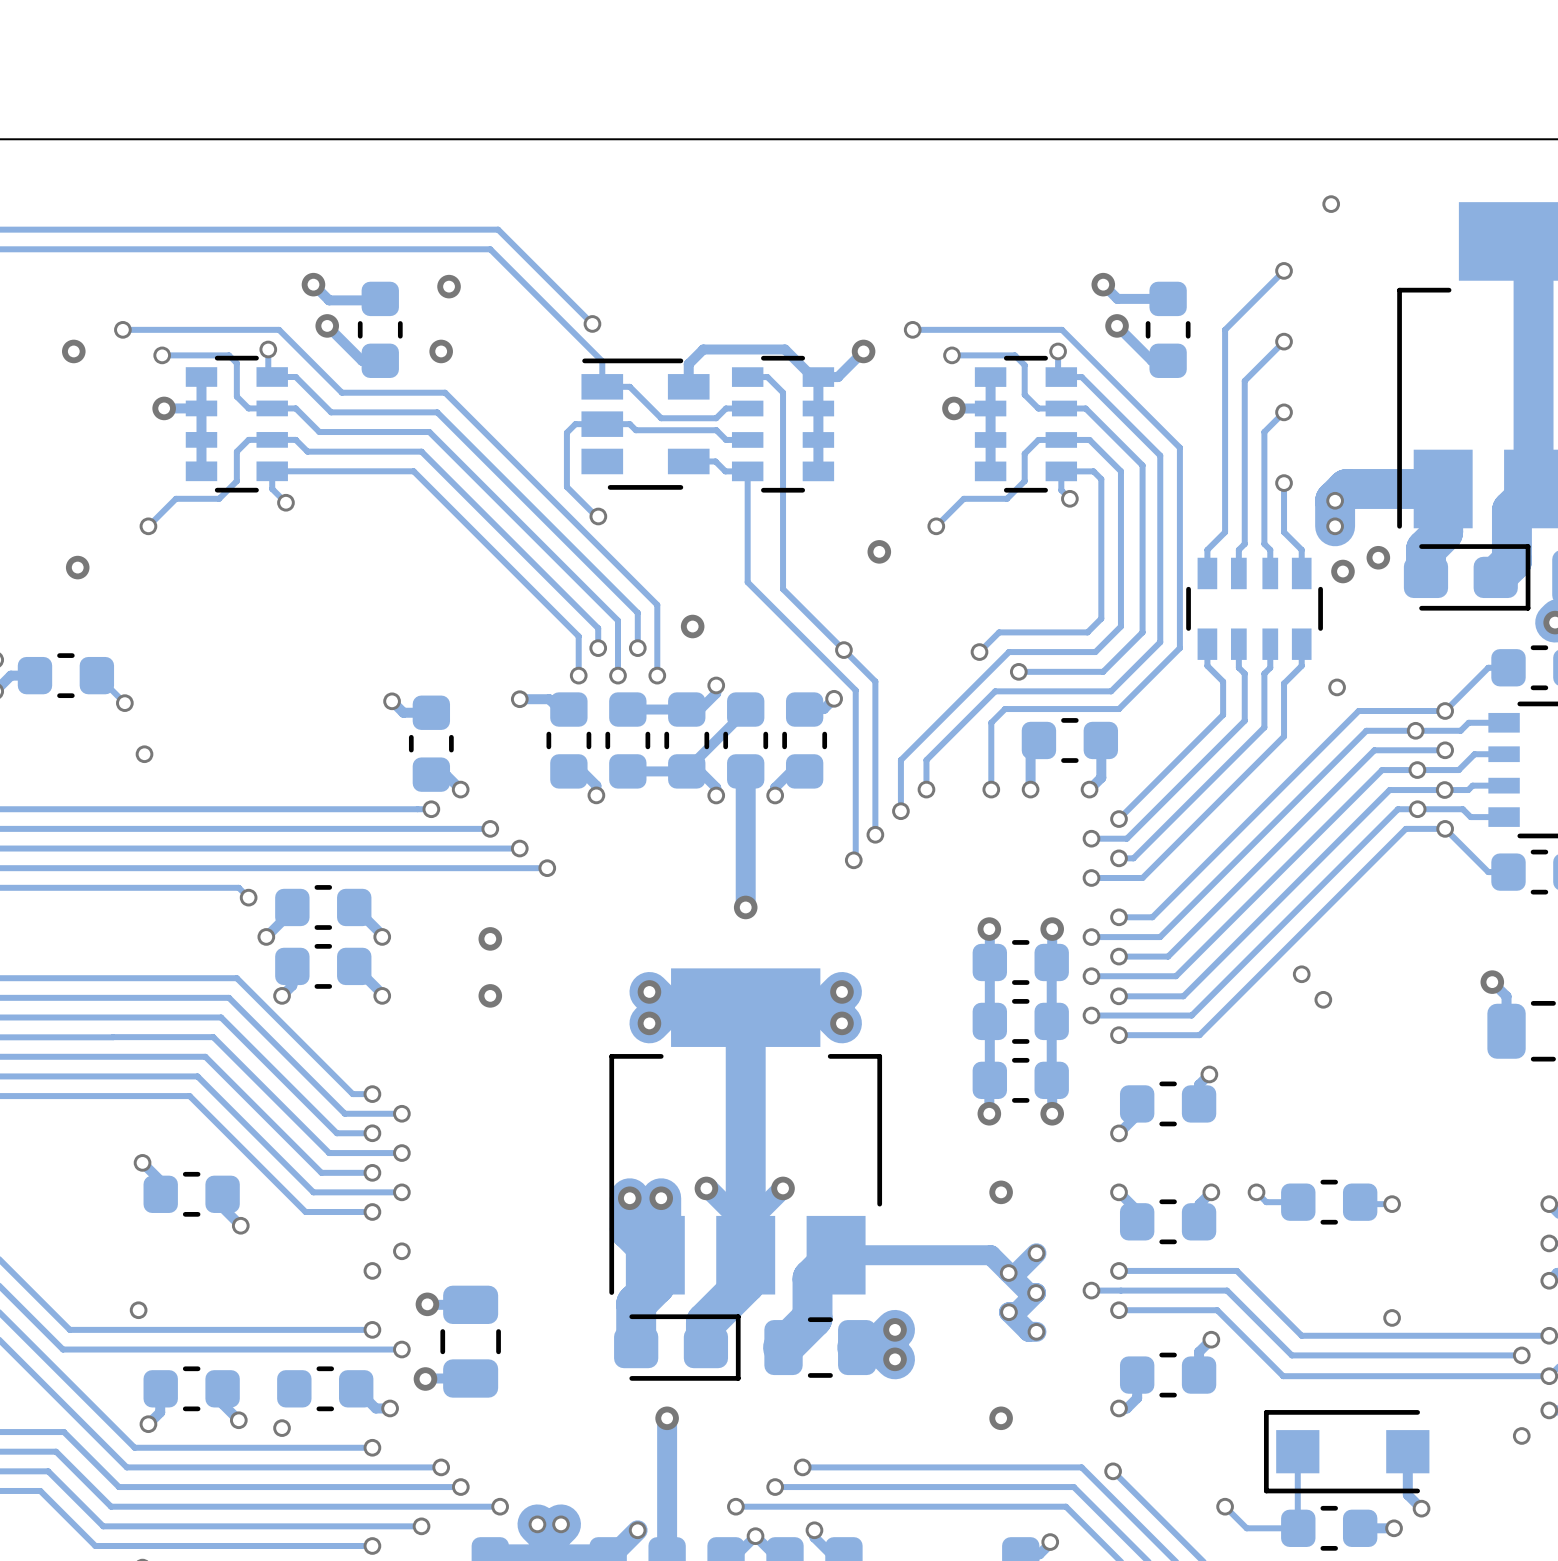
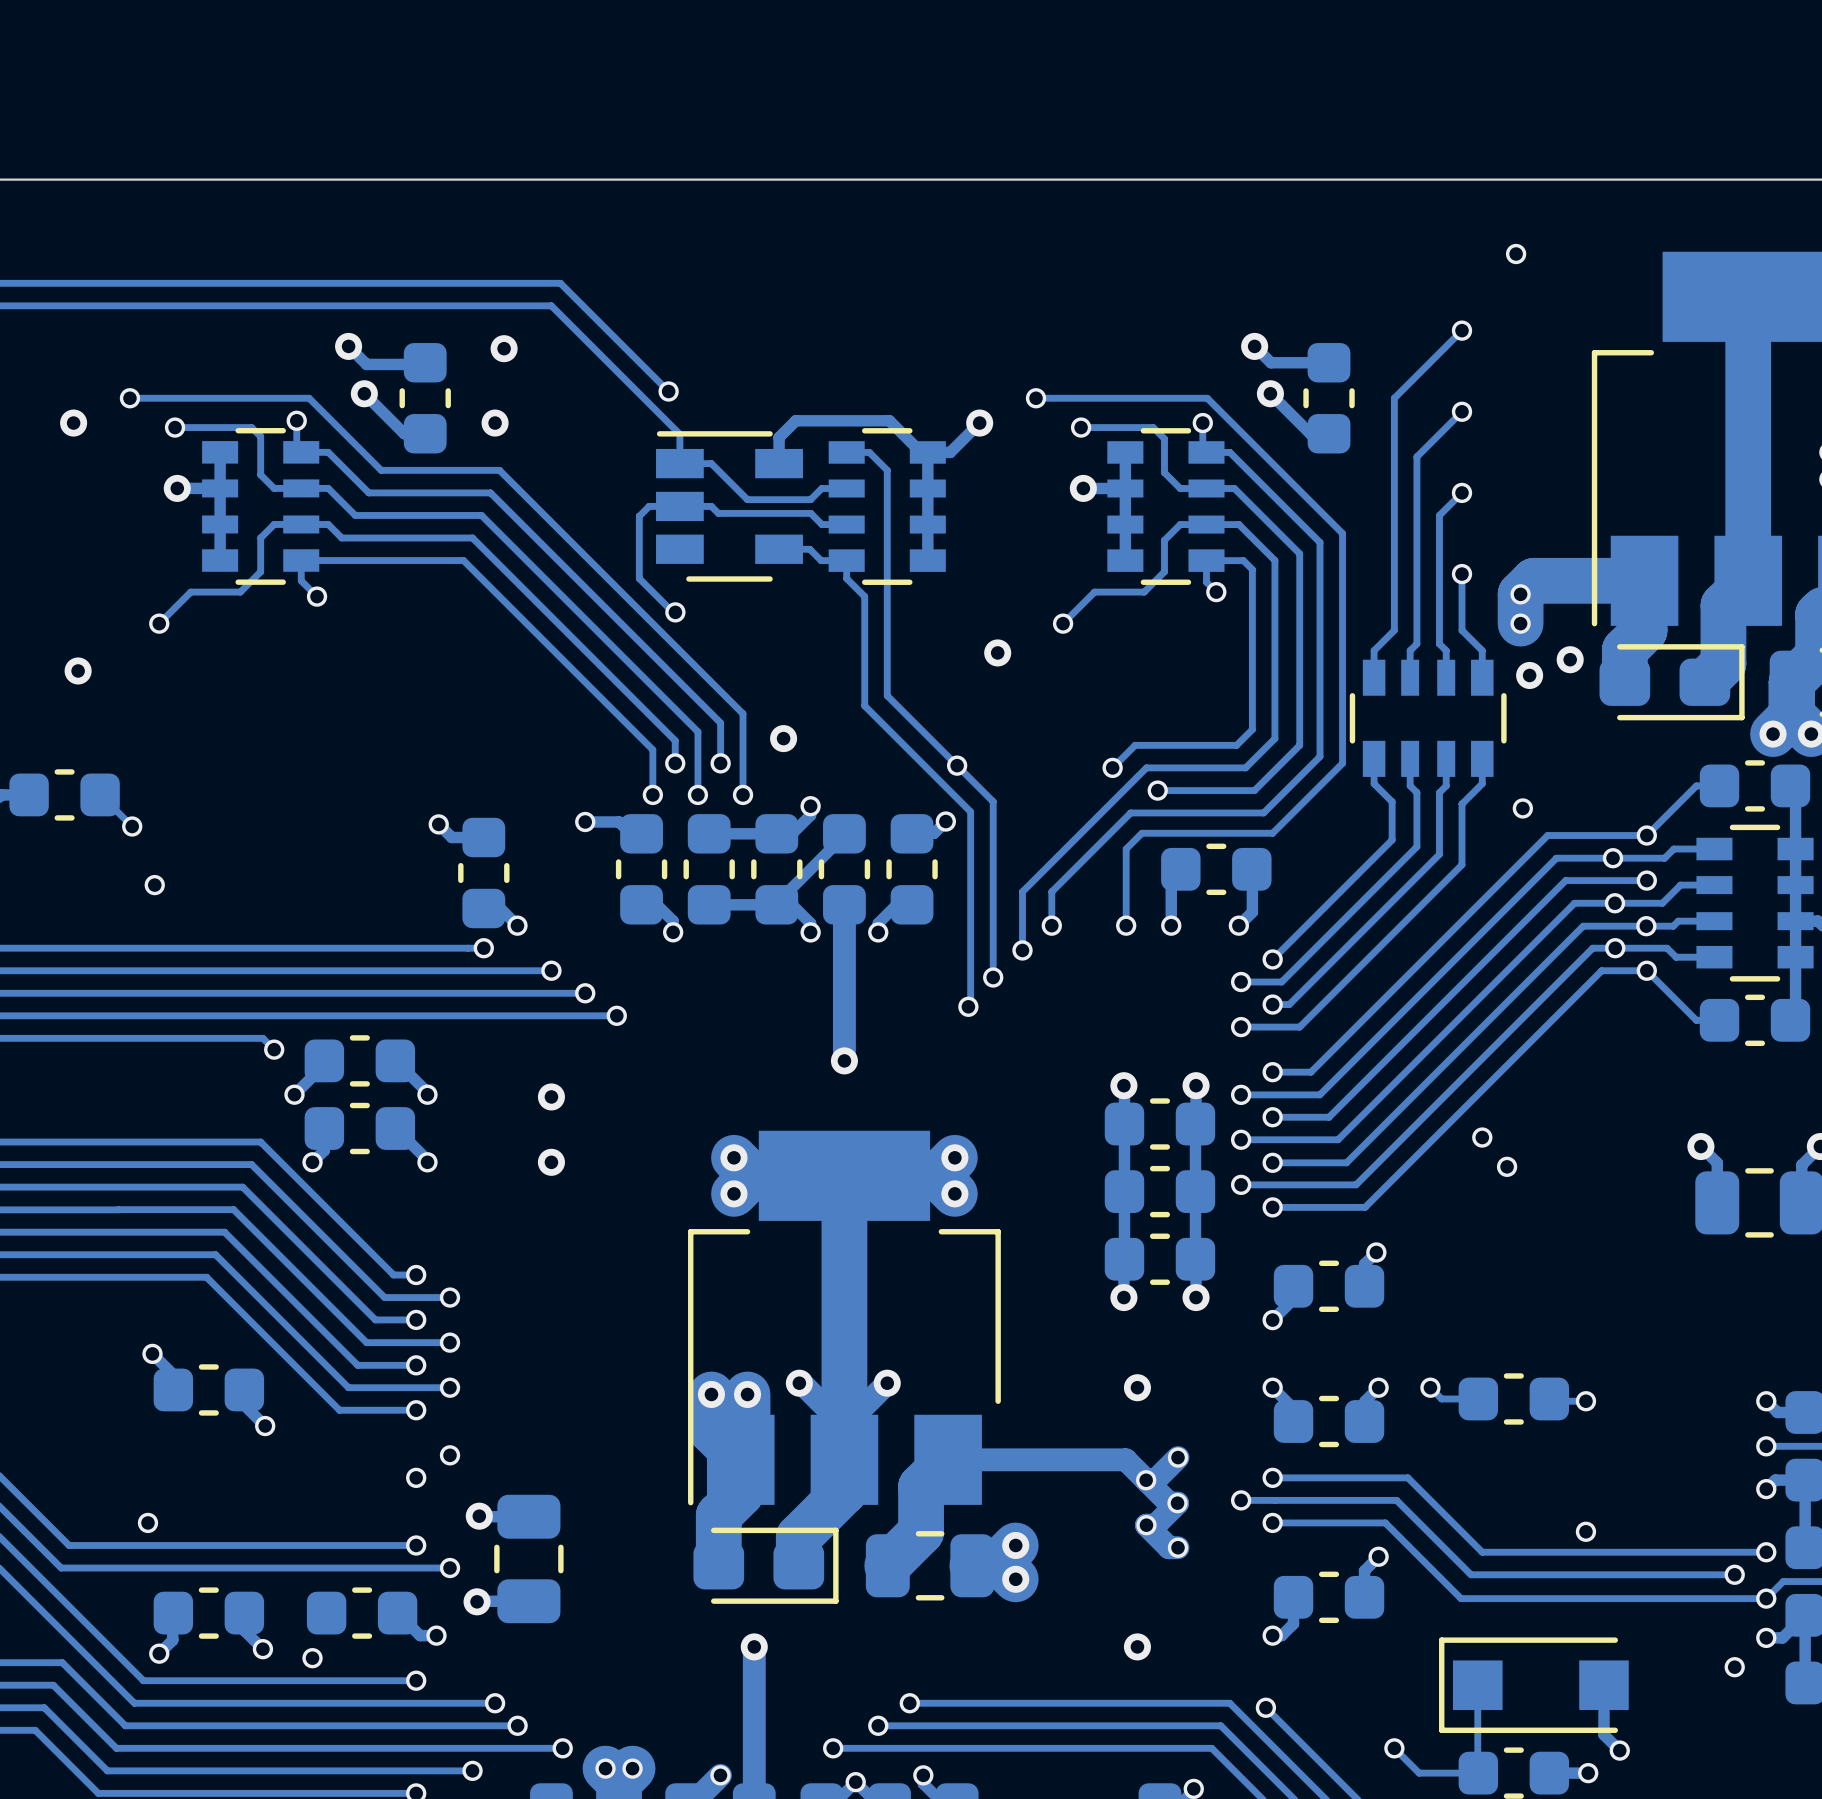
track: (747, 487) (747, 582) (763, 598) -> (846, 578) (864, 596) (864, 705)

